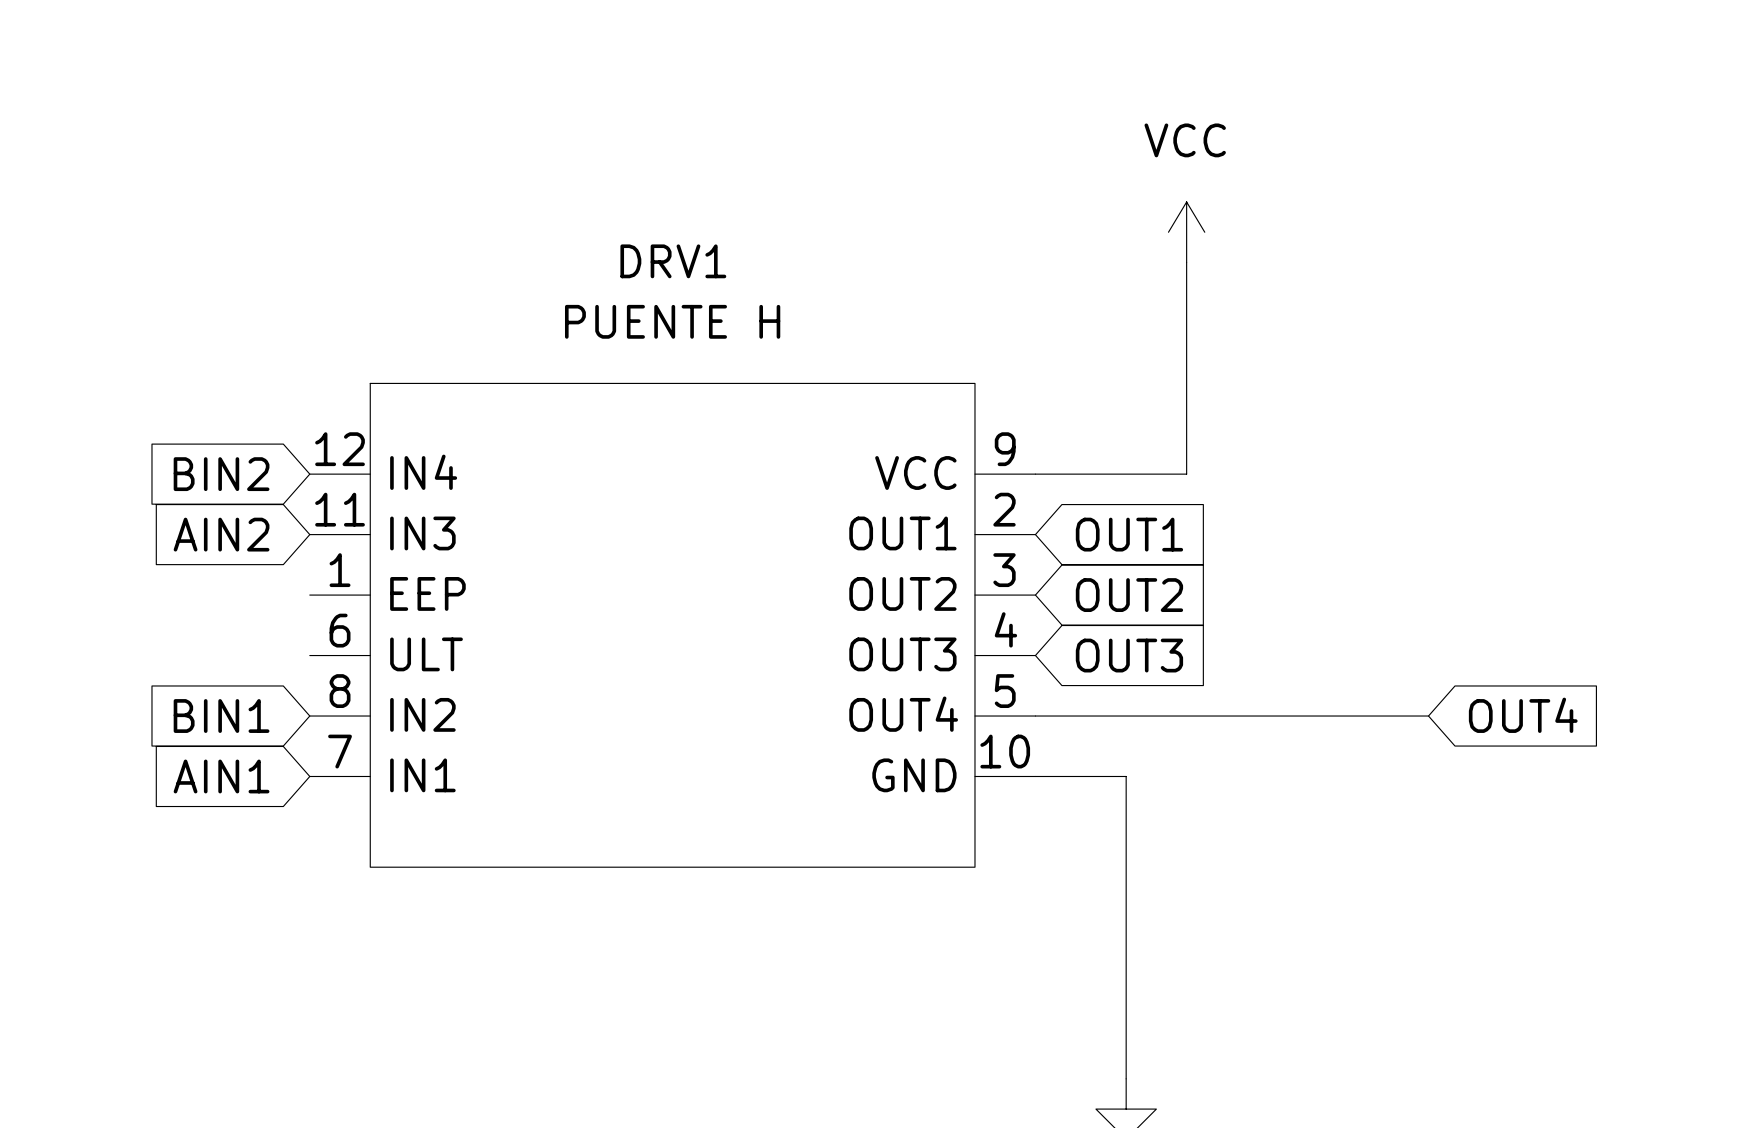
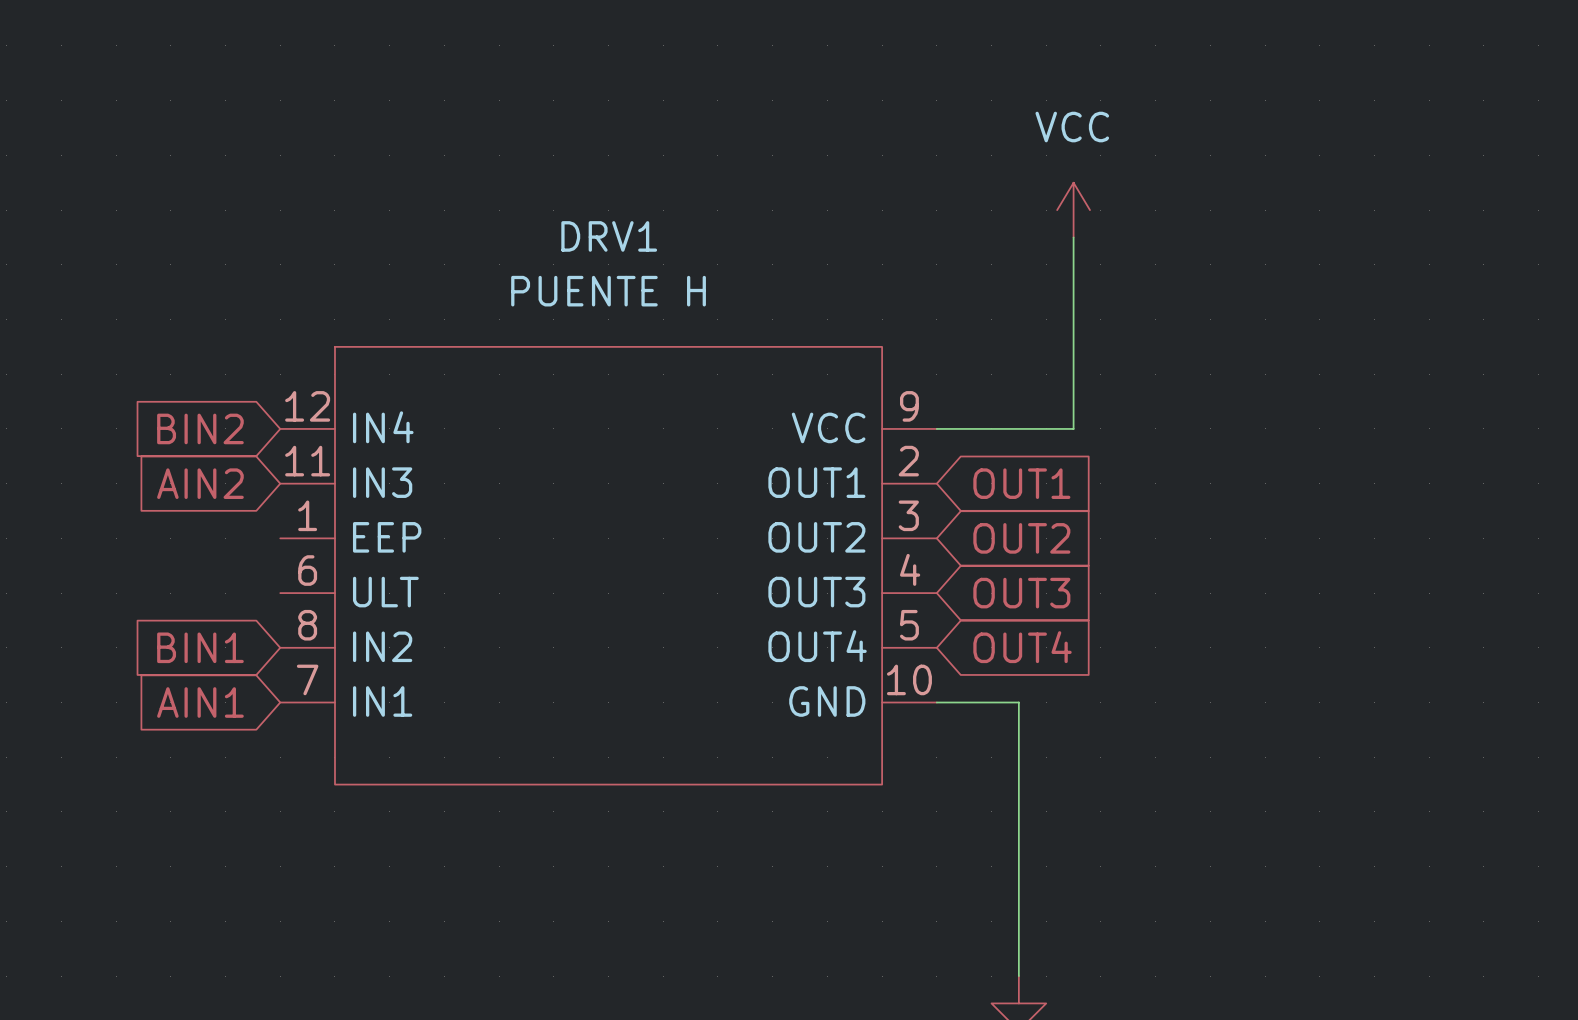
global label position: OUT4 (1523, 715) -> OUT4 (1022, 647)
wire: (1035, 716) (1428, 716) -> none

